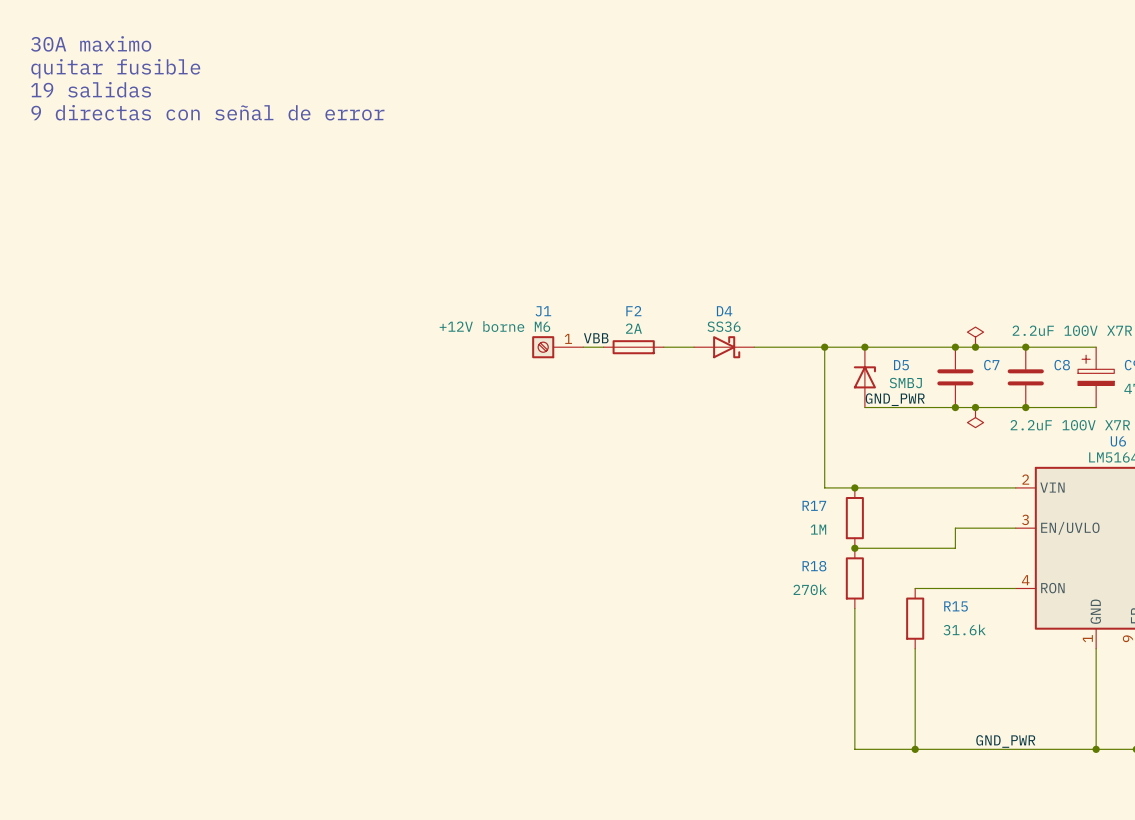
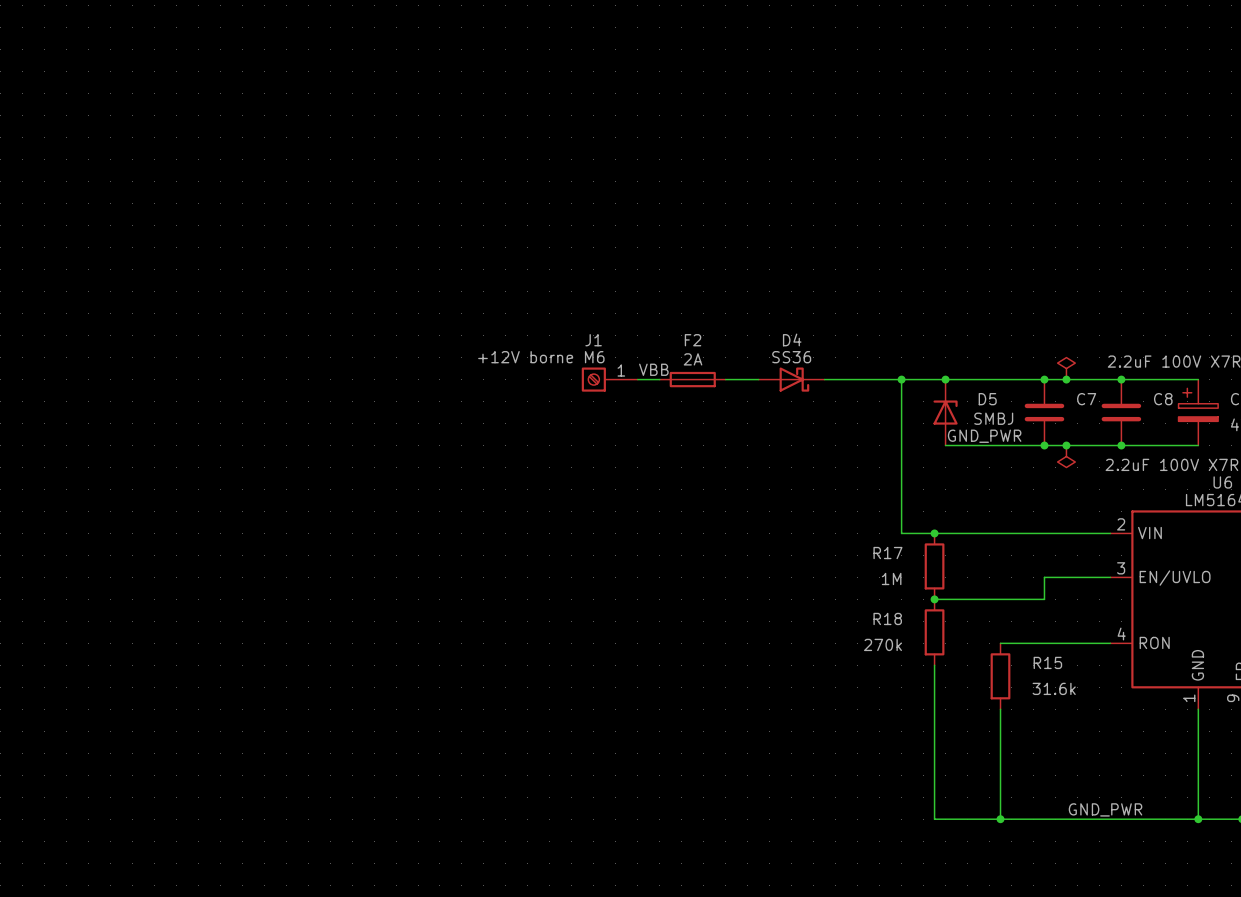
text: 30A maximo (91, 43) -> none
text: quitar fusible (115, 68) -> none
text: 19 salidas (91, 89) -> none
text: 9 directas con señal de error (207, 112) -> none

